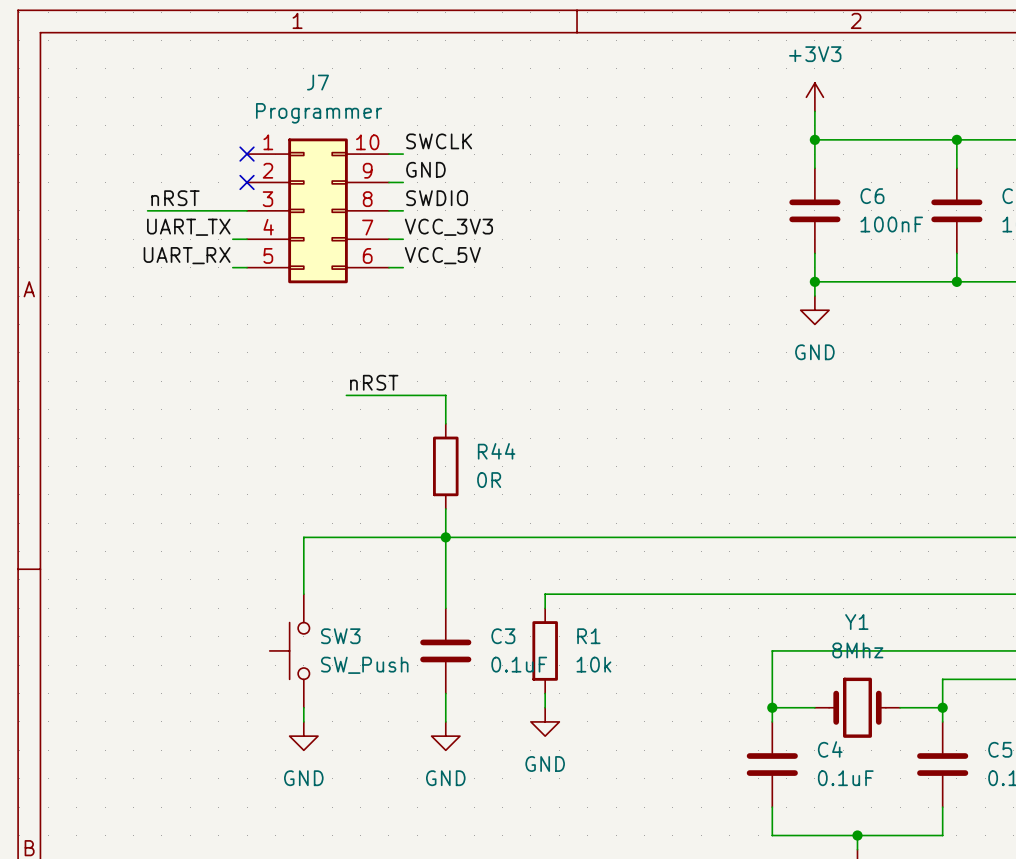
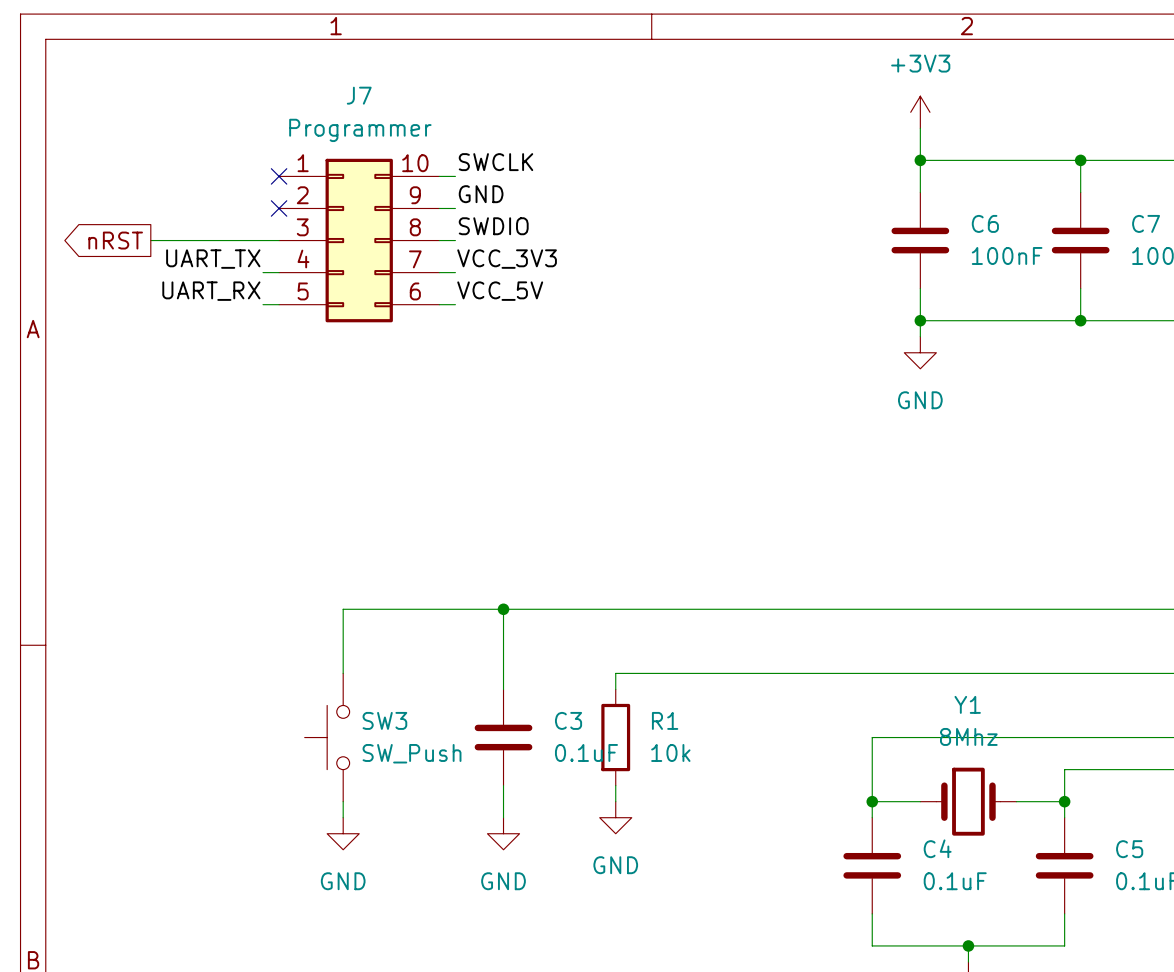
label: nRST (175, 198) -> none
global label: none -> nRST (115, 240)
wire: none -> (150, 240) (166, 240)
label: nRST (374, 382) -> none
wire: (346, 395) (445, 395) (445, 423) -> none
R44: 0R (445, 466) -> none
wire: (445, 508) (445, 537) -> none

